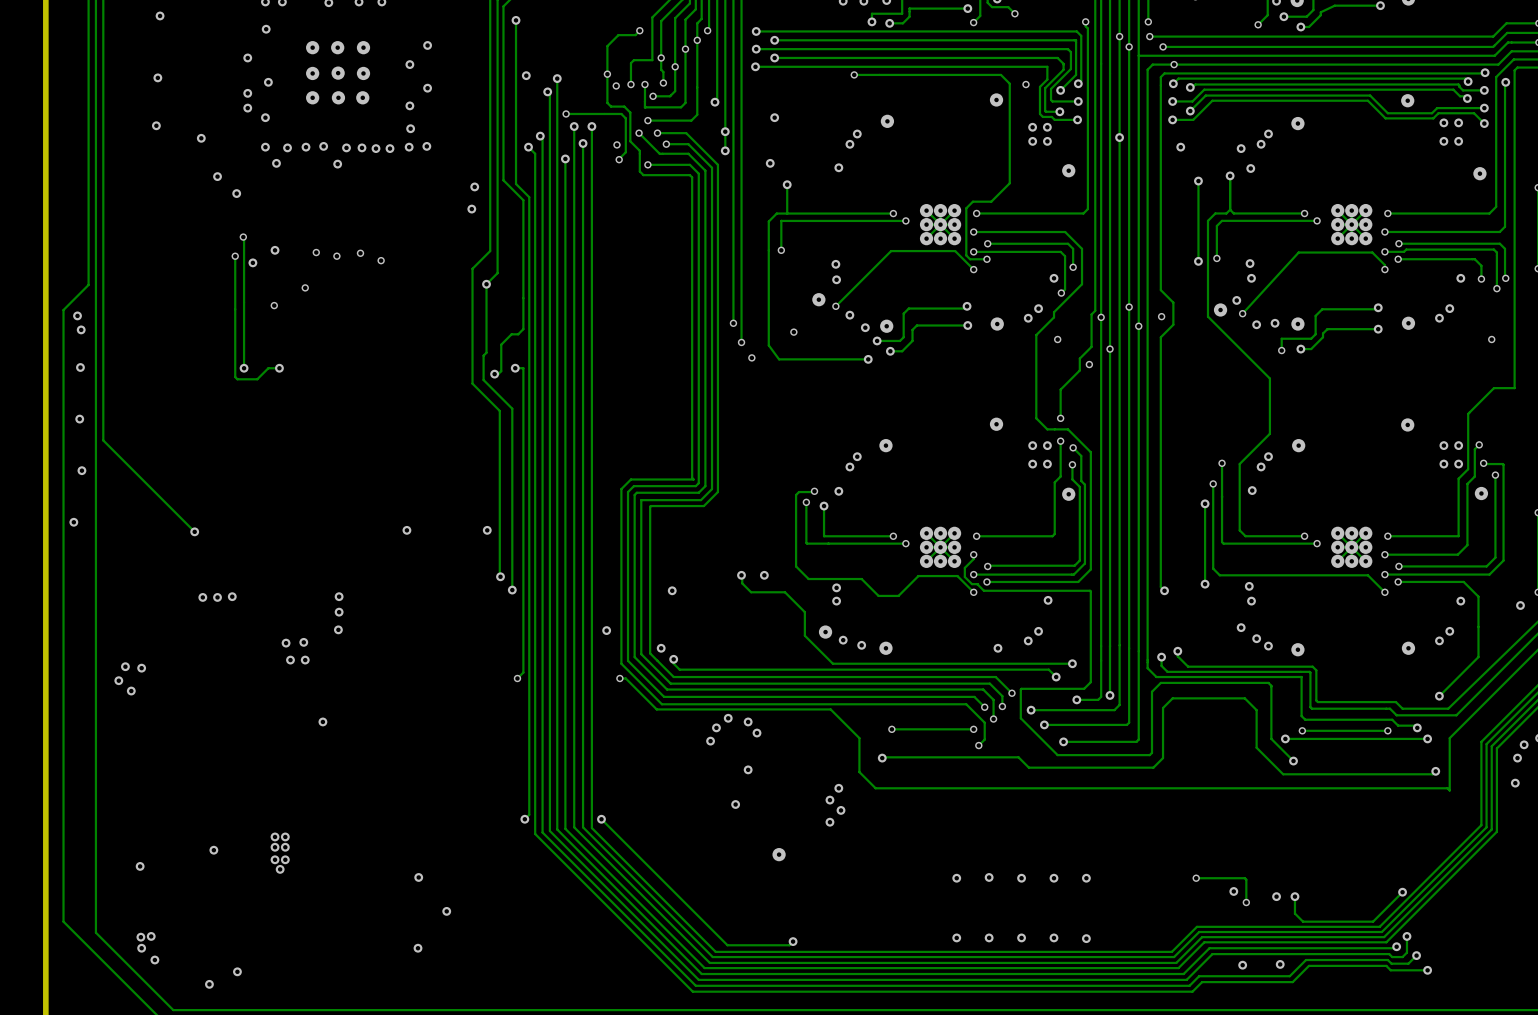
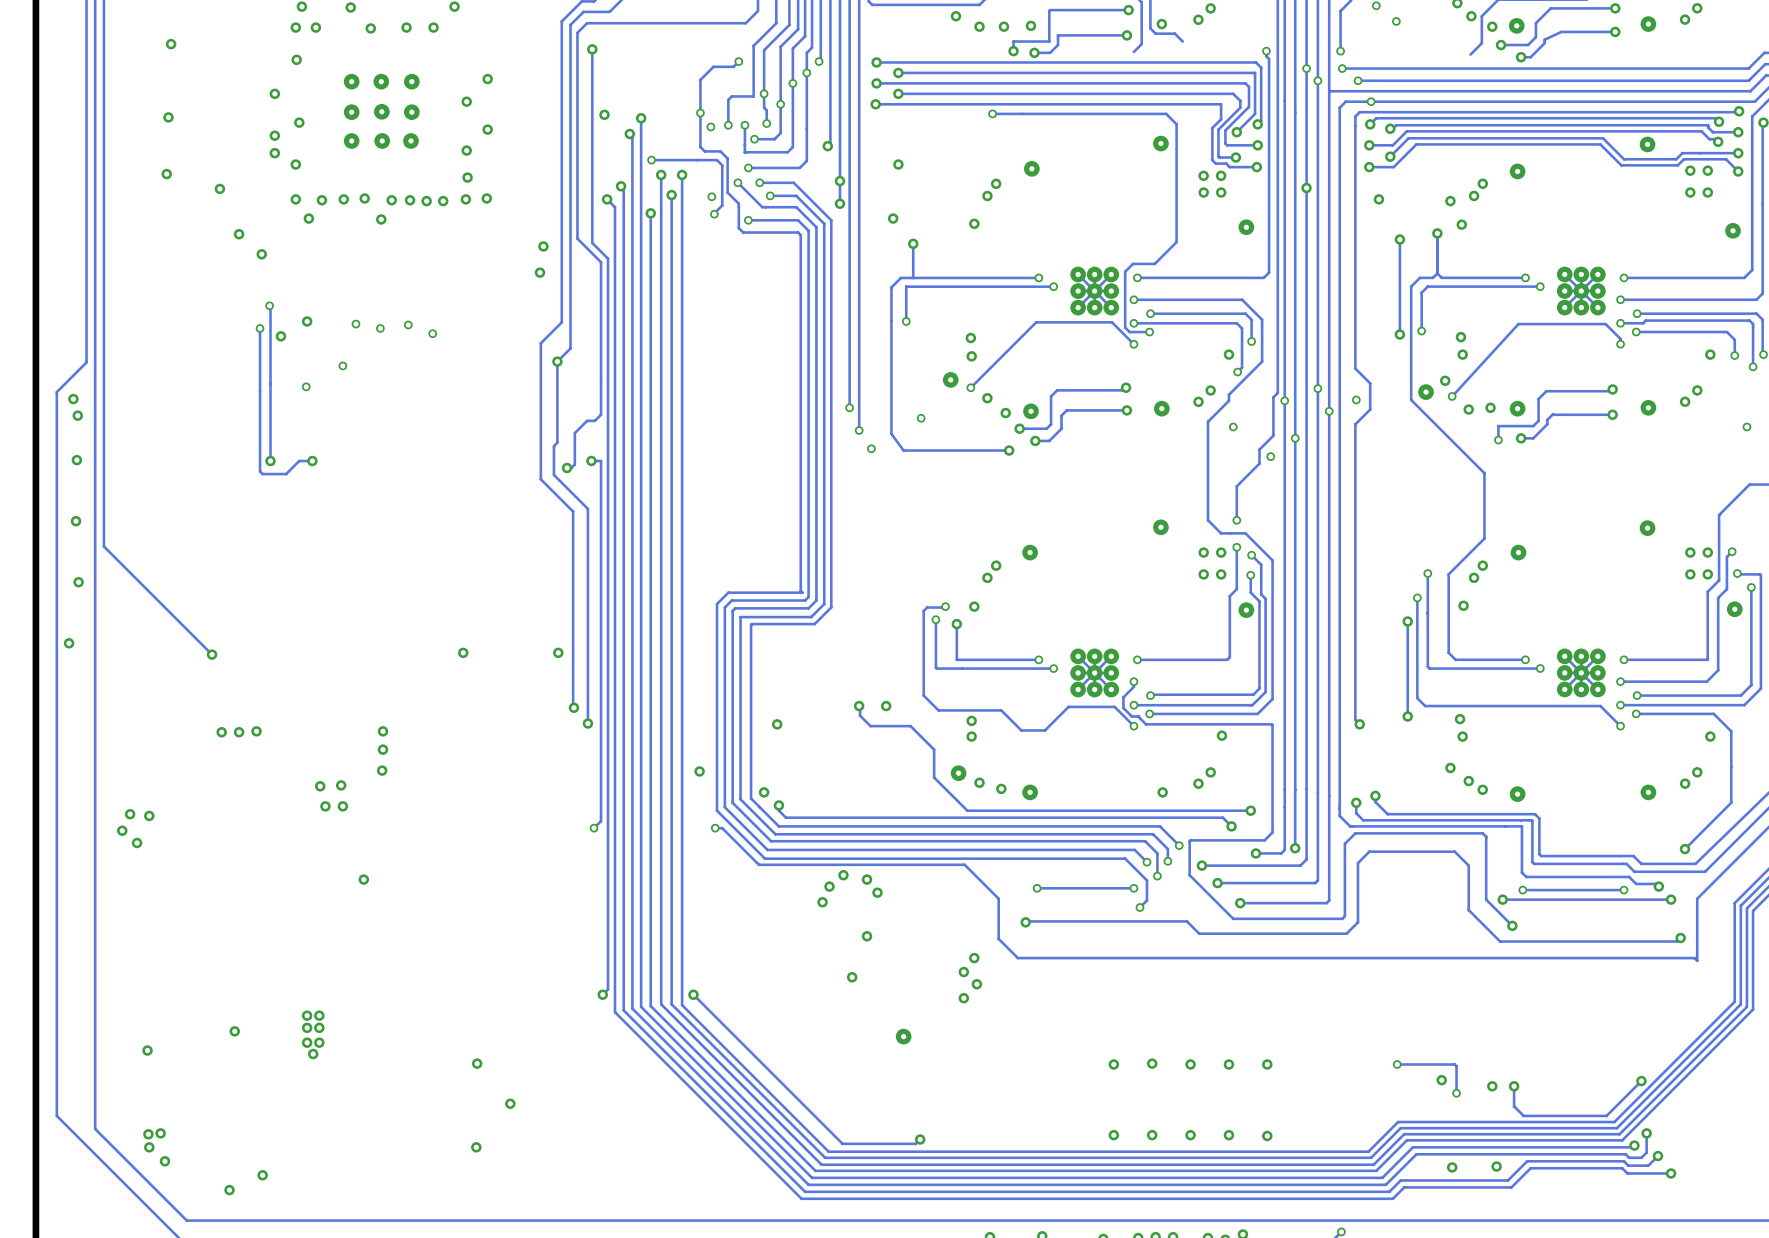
via: (1014, 13) -> none
via: (973, 22) -> none
via: (1258, 24) -> none
via: (1025, 84) -> none

